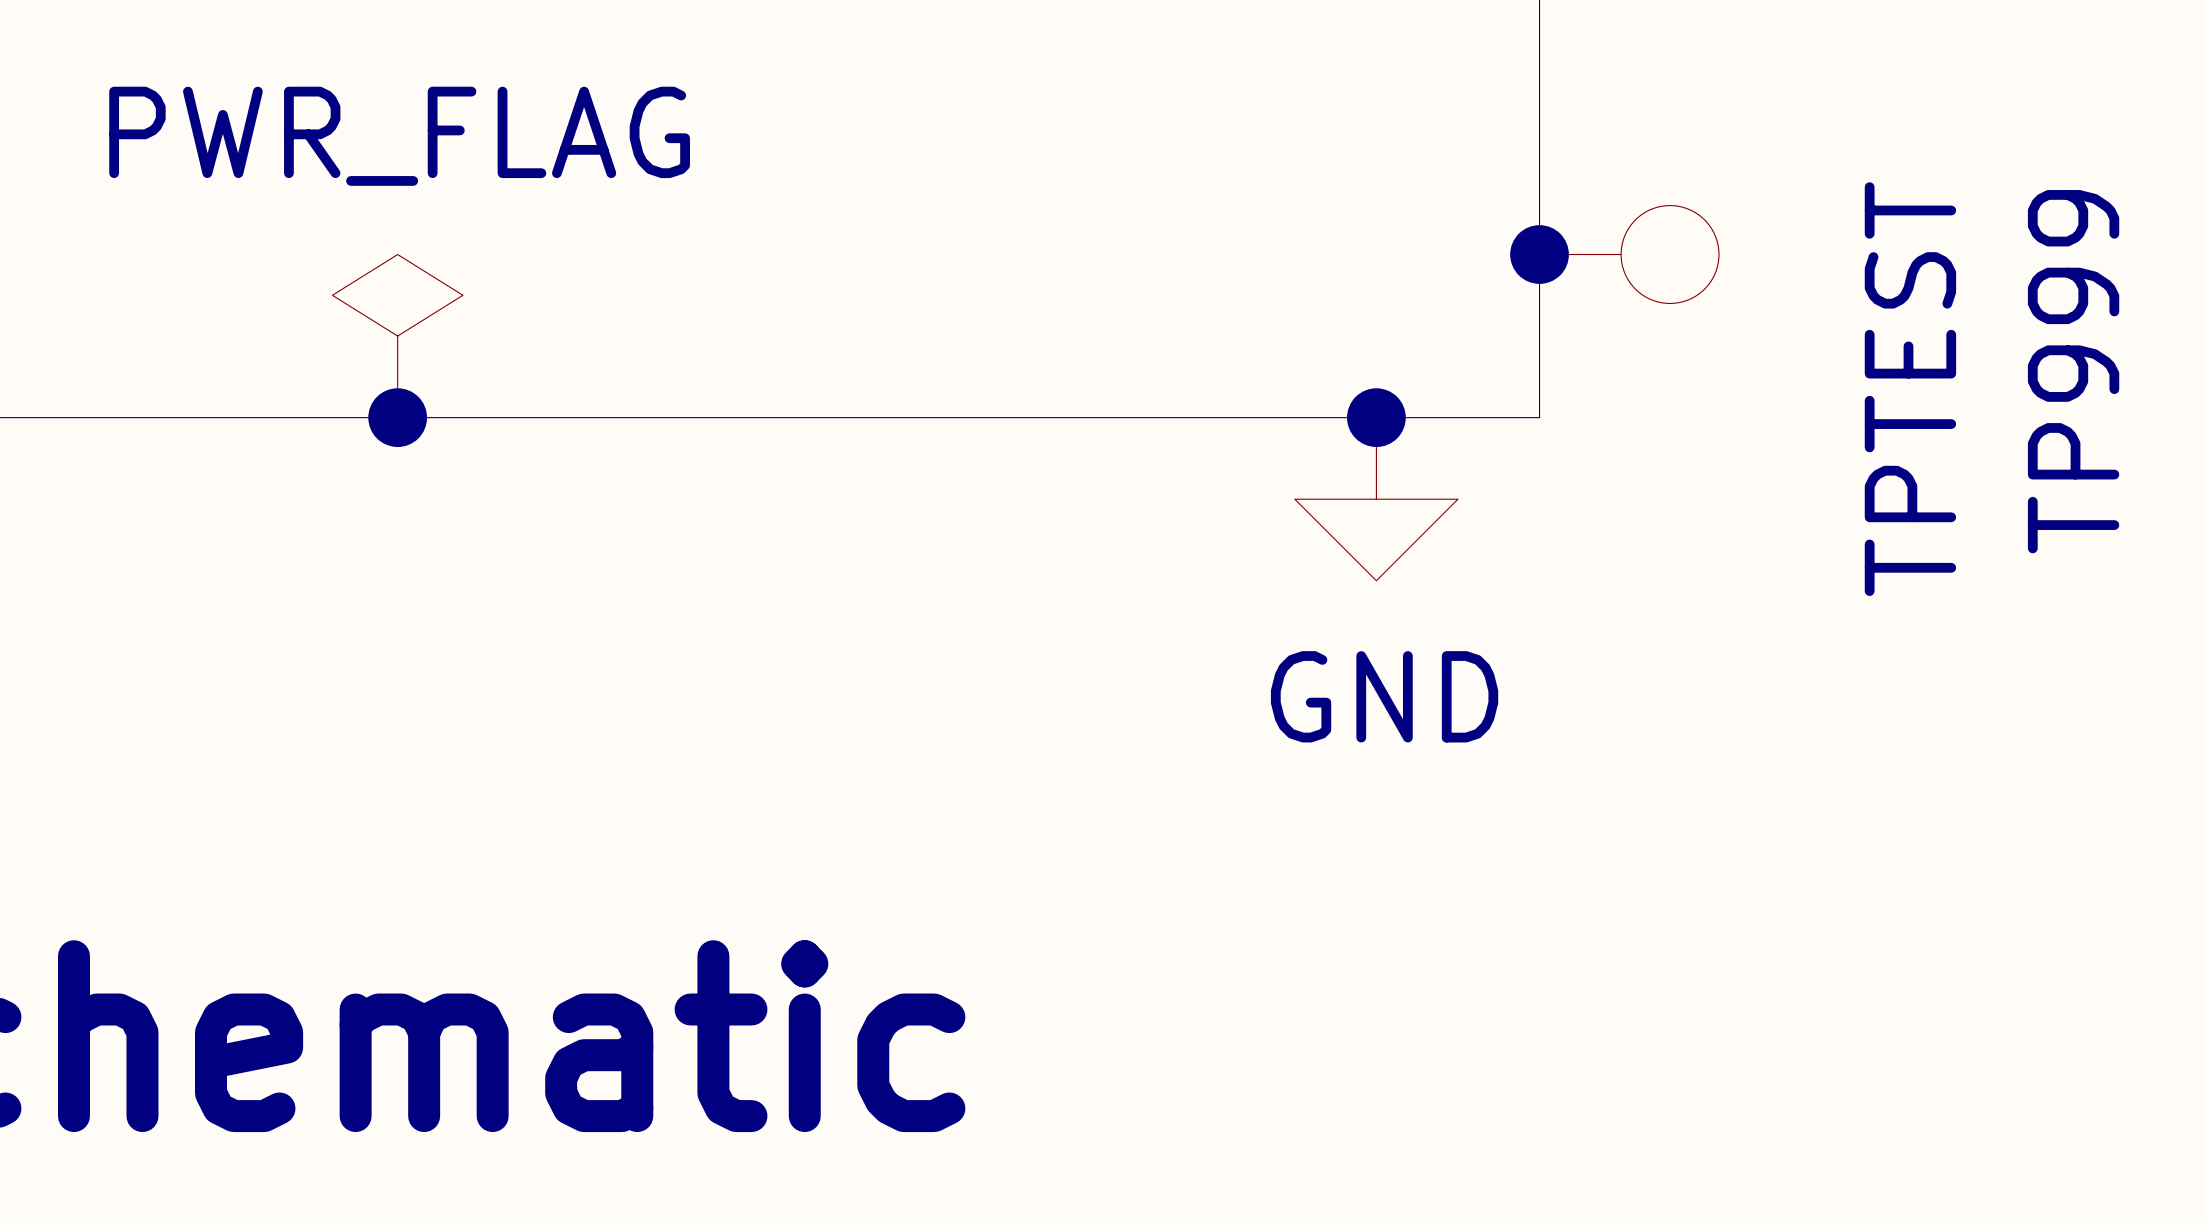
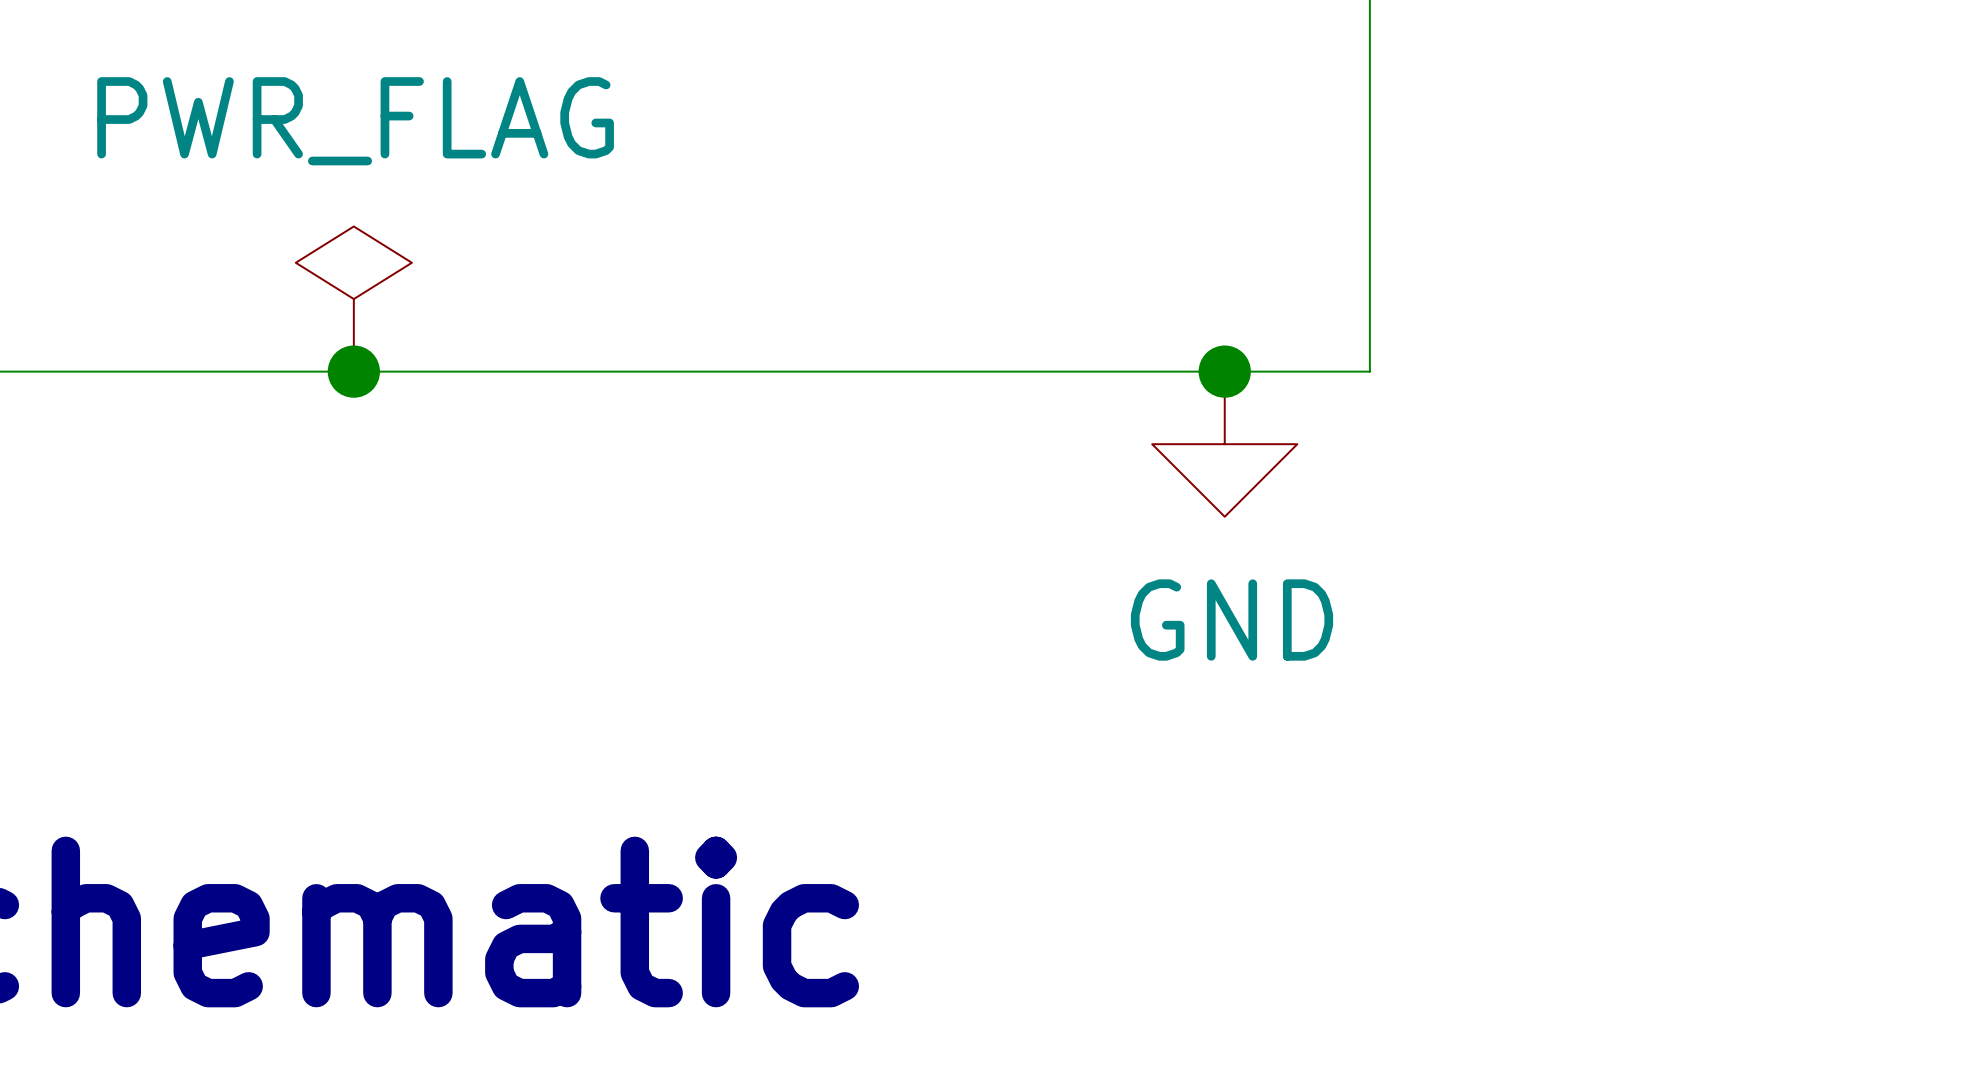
junction: (1539, 254) -> none
TP999: (1629, 254) -> none

